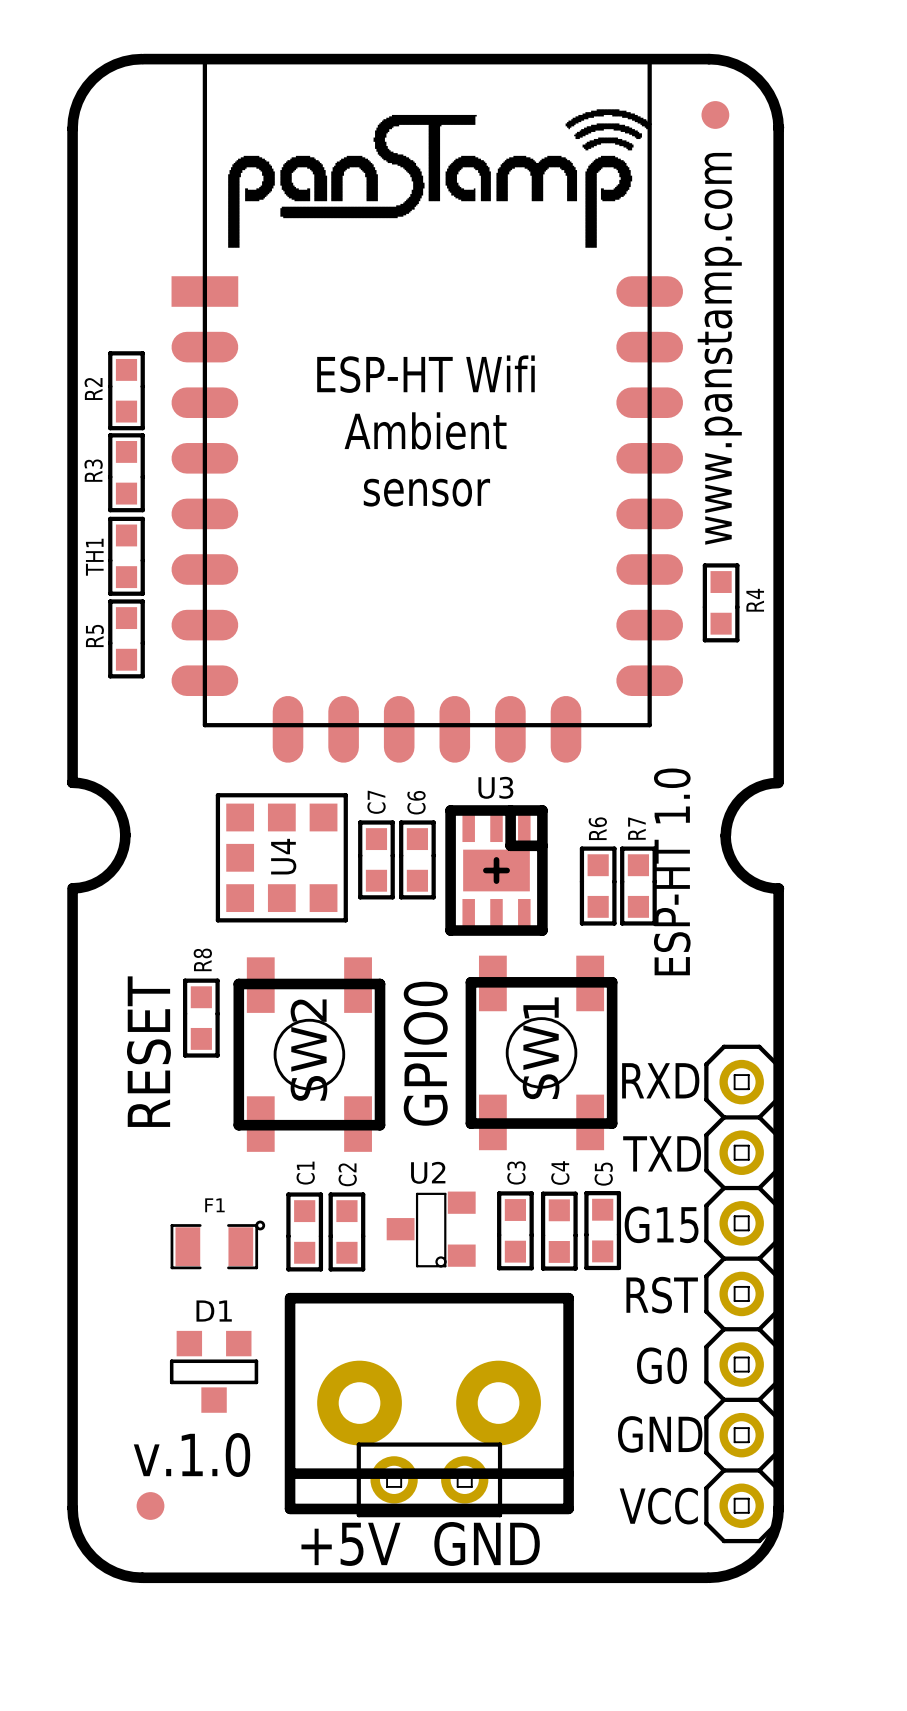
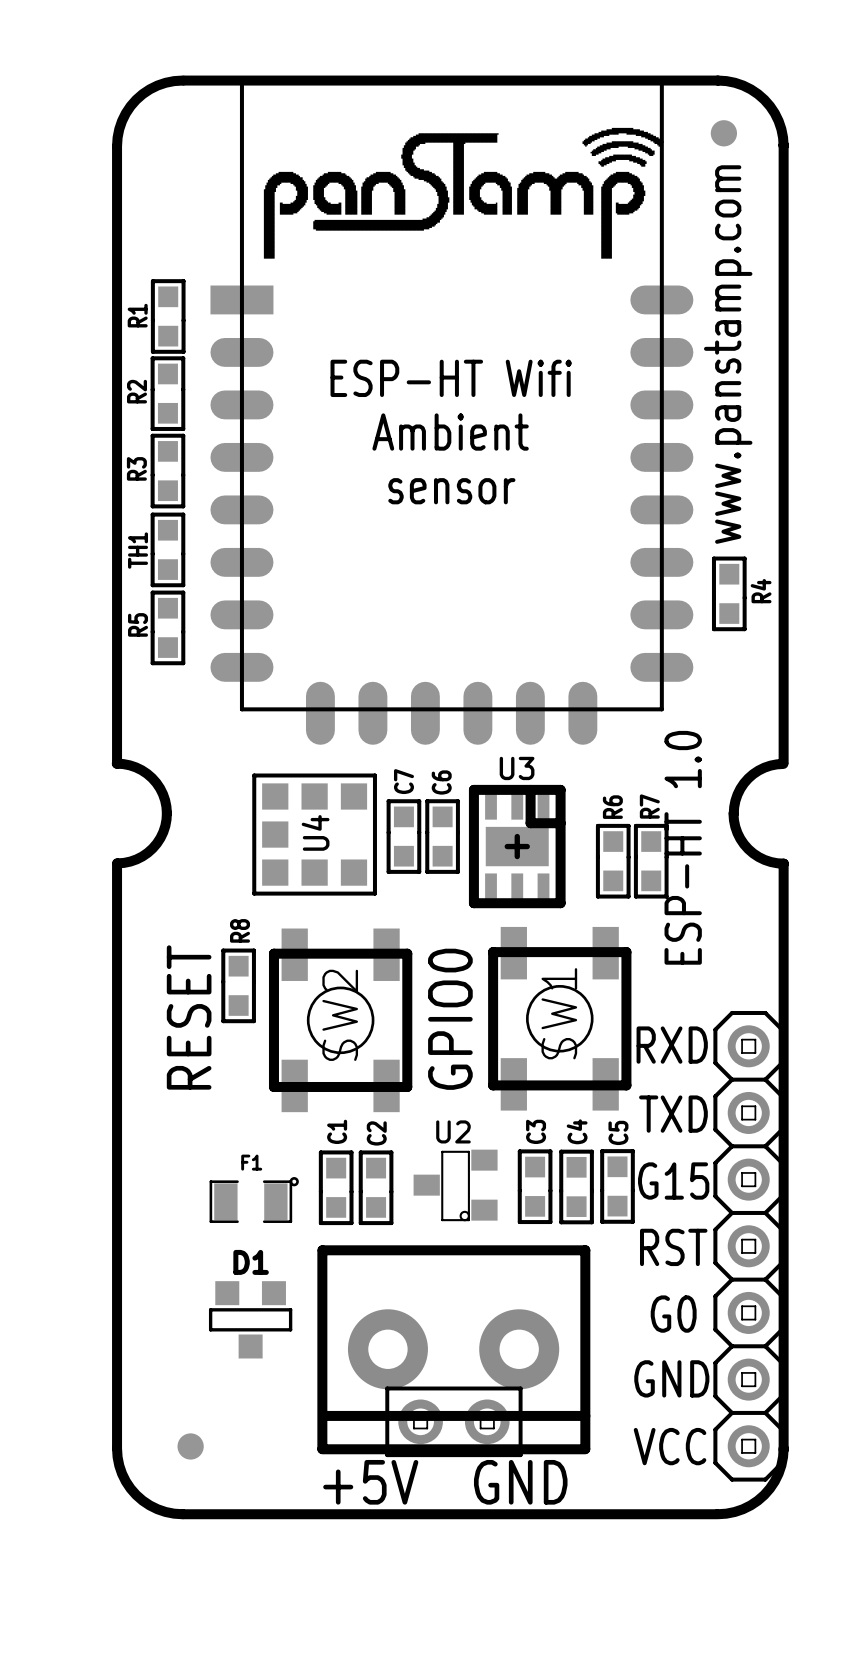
R1: none -> (168, 316)
text: v.1.0 (191, 1455) -> none

